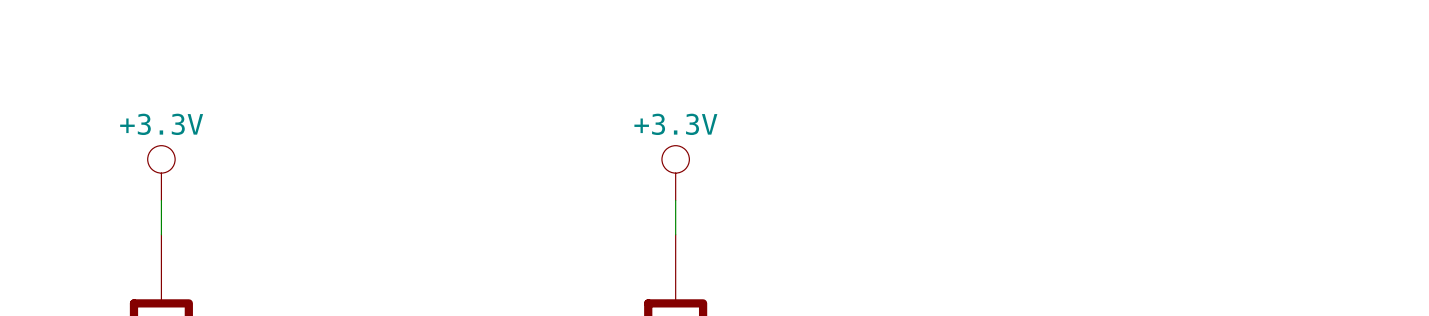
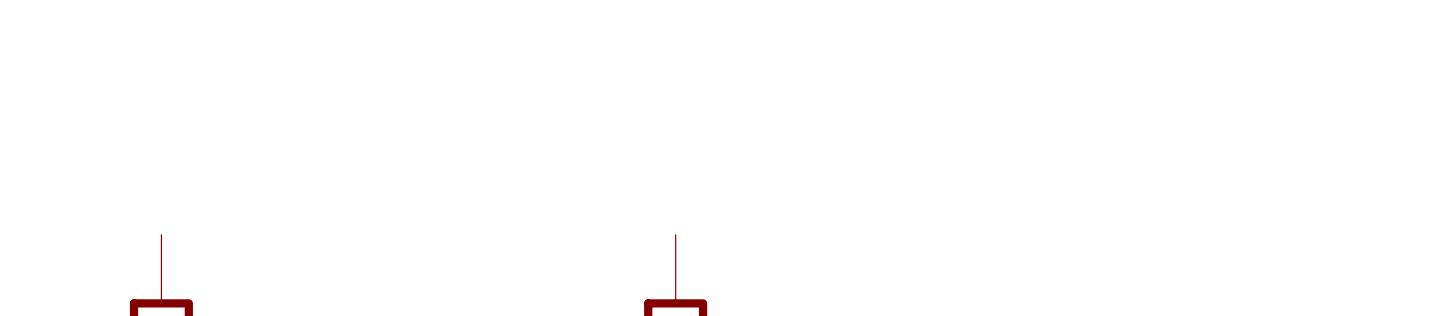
power symbol: +3.3V (161, 173) -> none
power symbol: +3.3V (675, 173) -> none
wire: (161, 200) (161, 234) -> none
wire: (675, 200) (675, 234) -> none

